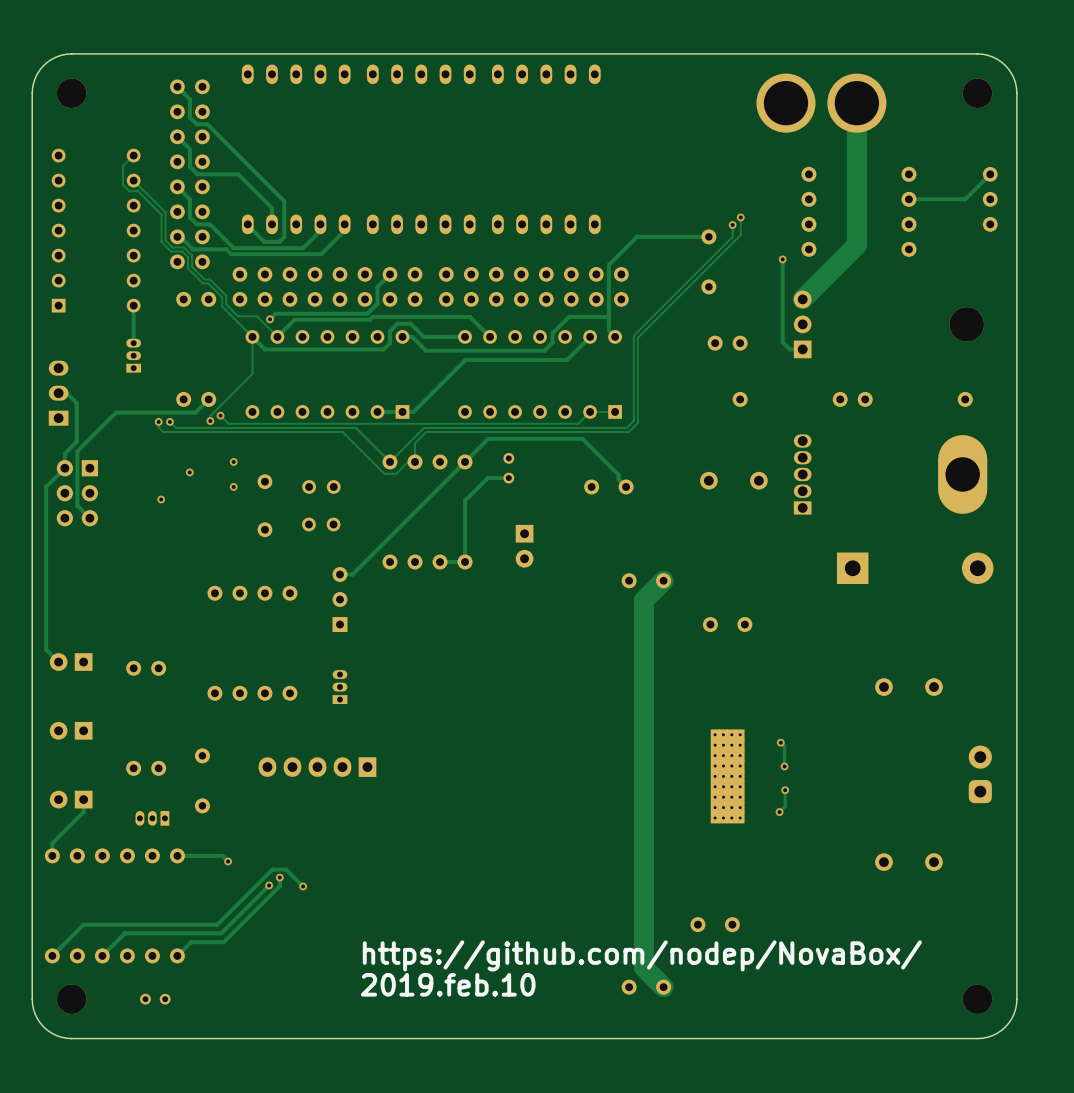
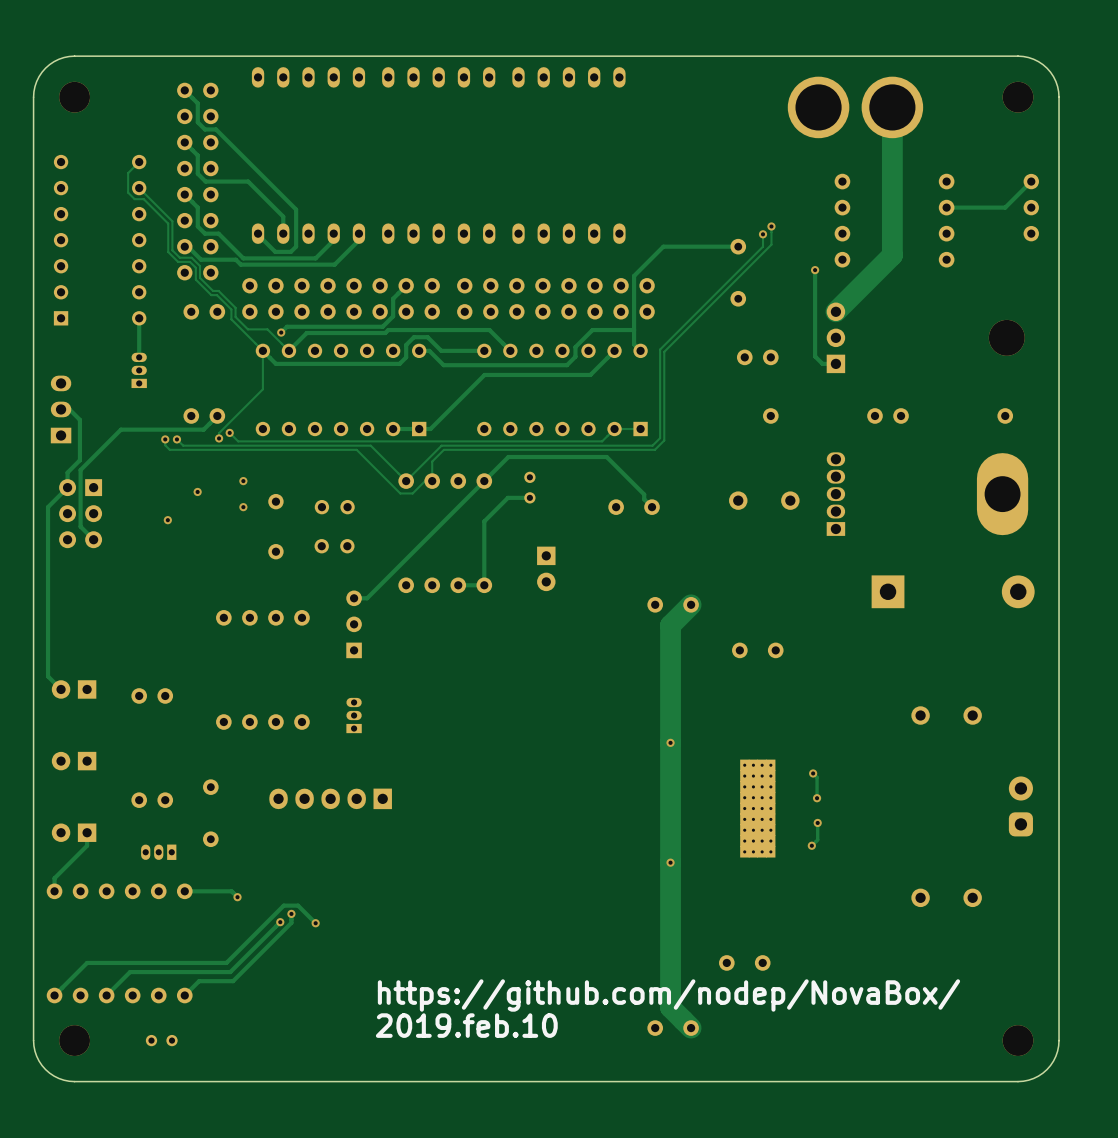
via: none -> (670, 742)
via: none -> (670, 862)

